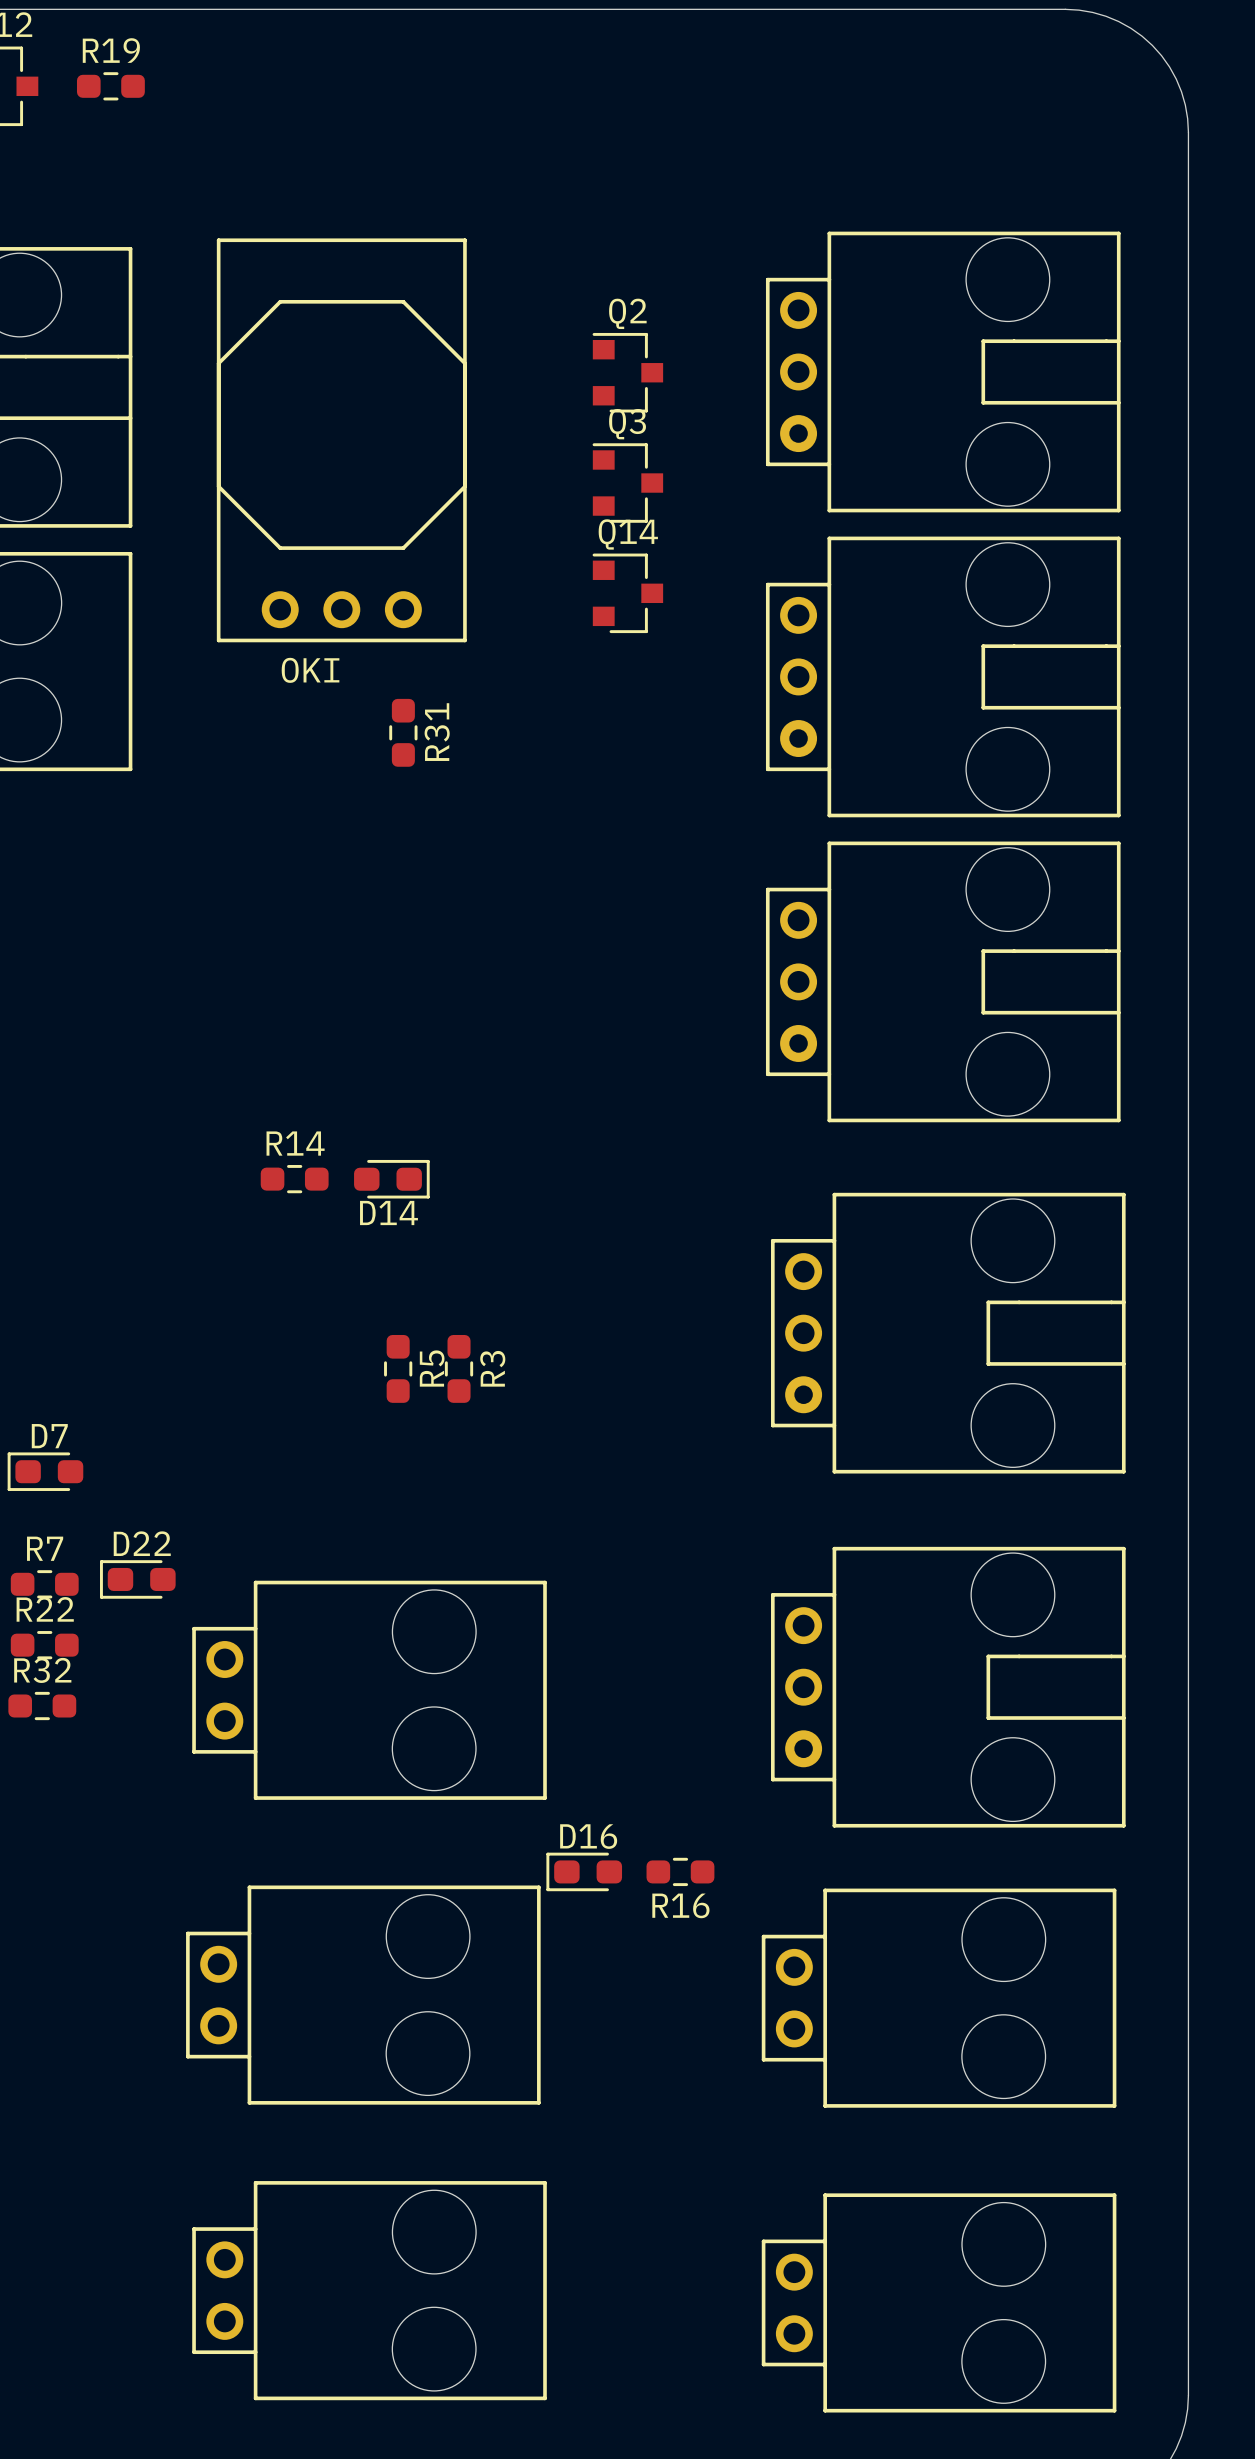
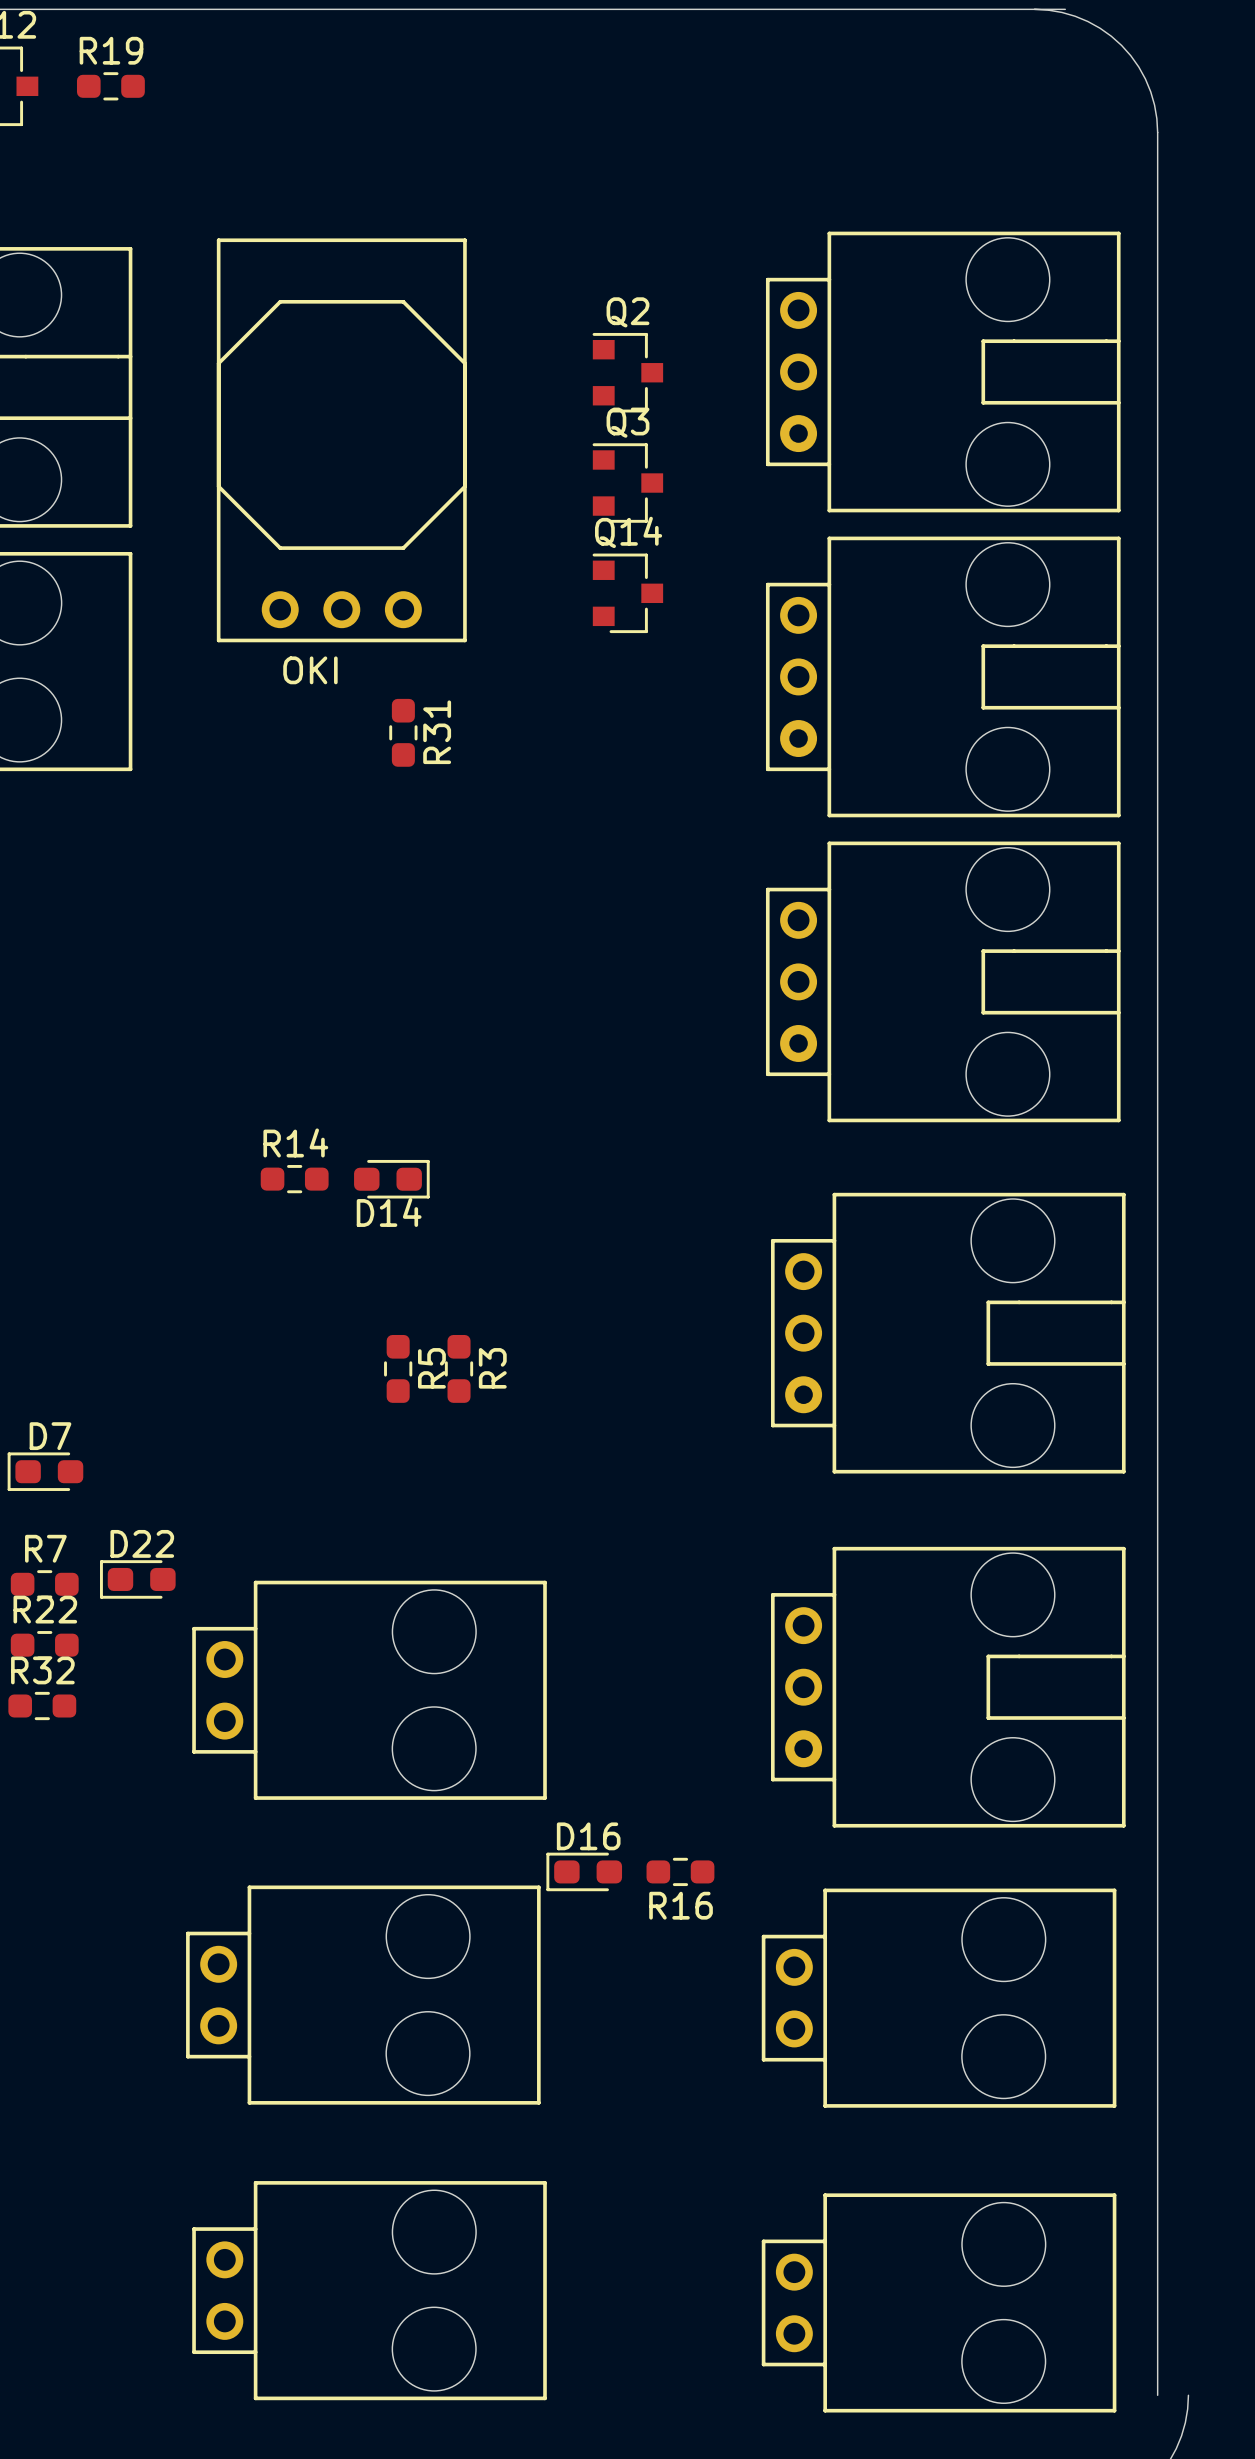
board edge: (1065, 9) (1079, 10) (1105, 16) (1130, 28) (1152, 45) (1169, 66) (1176, 79) (1185, 105) (1188, 132) (1188, 2395) -> (1034, 9) (1048, 10) (1075, 16) (1100, 28) (1121, 45) (1138, 66) (1145, 79) (1154, 105) (1157, 132) (1157, 2395)

